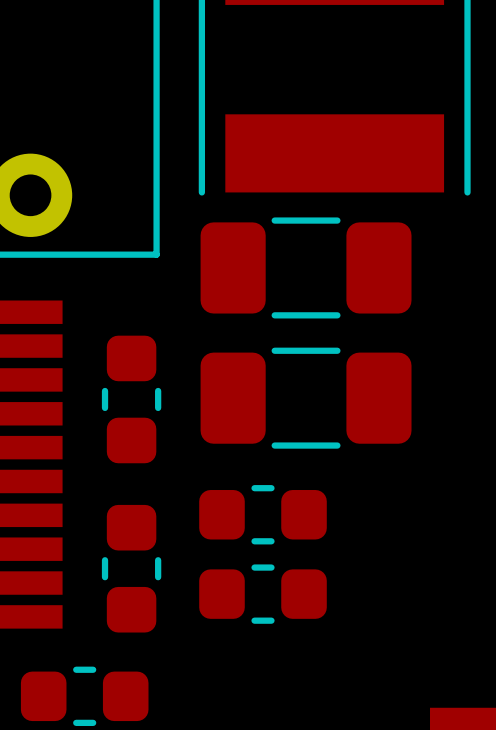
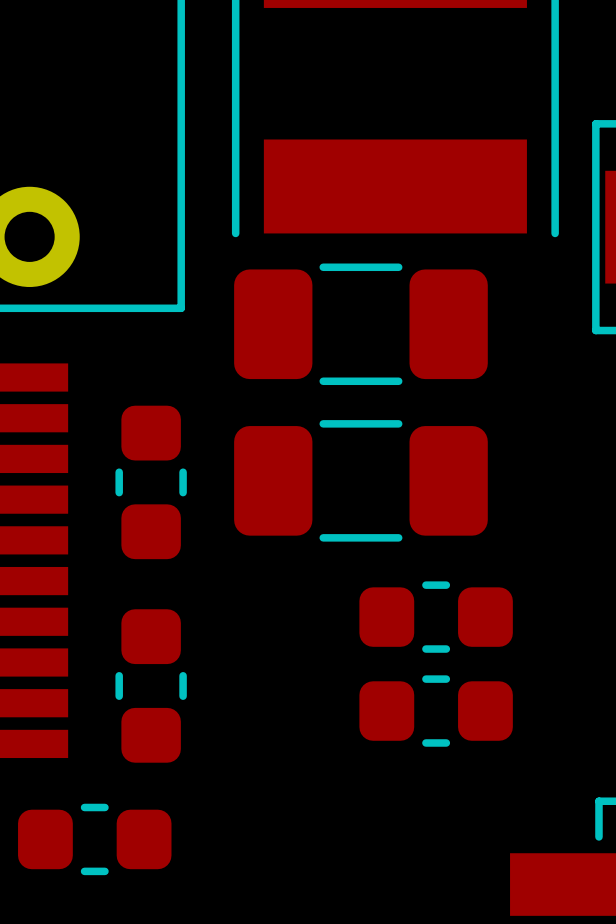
part: none -> (436, 617)
part: (263, 514) -> none
part: none -> (436, 711)
part: (263, 594) -> none

